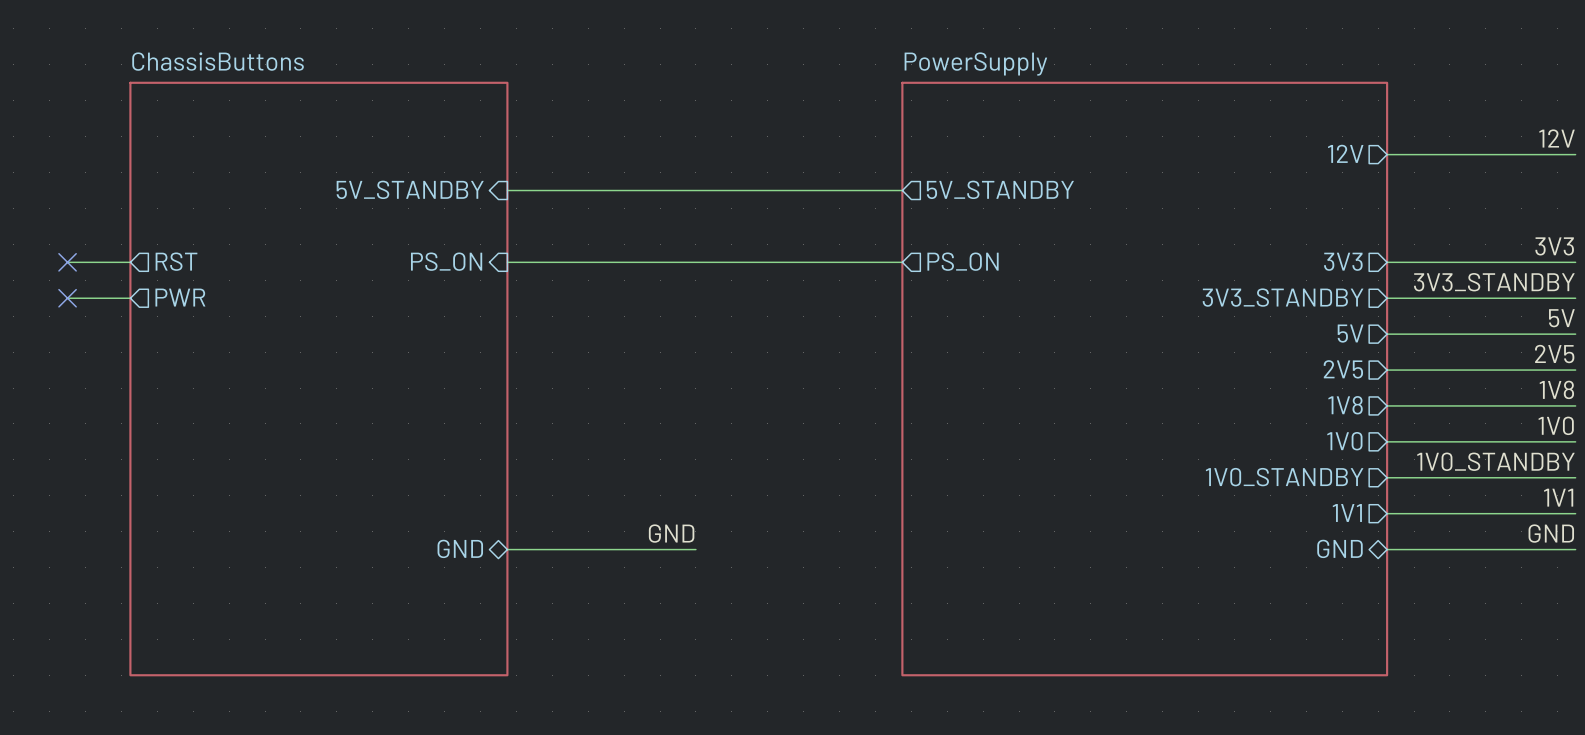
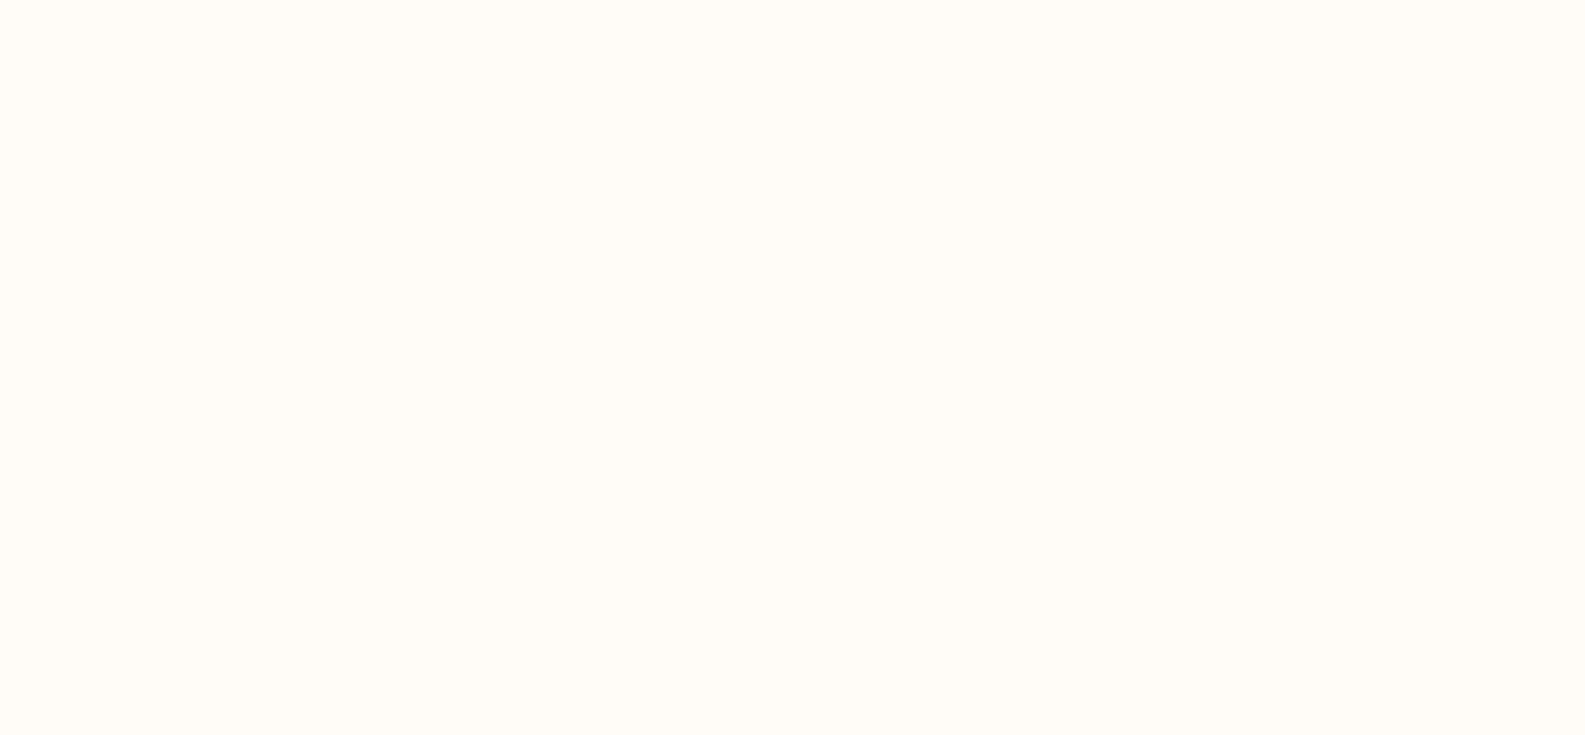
label: 12V (1557, 138) -> none
sheet pin: 12V (1345, 153) -> none
wire: (1387, 154) (1575, 154) -> none
sheet pin: 5V_STANDBY (410, 189) -> none
sheet pin: 5V_STANDBY (1000, 189) -> none
wire: (507, 190) (902, 190) -> none
label: 3V3 (1554, 246) -> none
sheet pin: RST (176, 261) -> none
sheet pin: PS_ON (446, 261) -> none
sheet pin: PS_ON (963, 261) -> none
sheet pin: 3V3 (1343, 261) -> none
wire: (67, 262) (130, 262) -> none
no-connect mark: (67, 262) -> none
wire: (507, 262) (902, 262) -> none
wire: (1387, 262) (1575, 262) -> none
label: 3V3_STANDBY (1494, 282) -> none
sheet pin: PWR (180, 297) -> none
sheet pin: 3V3_STANDBY (1283, 297) -> none
wire: (67, 298) (130, 298) -> none
no-connect mark: (67, 298) -> none
wire: (1387, 298) (1575, 298) -> none
label: 5V (1561, 318) -> none
sheet pin: 5V (1350, 333) -> none
wire: (1387, 334) (1575, 334) -> none
label: 2V5 (1554, 354) -> none
sheet pin: 2V5 (1343, 369) -> none
wire: (1387, 370) (1575, 370) -> none
sheet ChassisButtons: (318, 379) -> none
sheet PowerSupply: (1144, 379) -> none
label: 1V8 (1556, 389) -> none
sheet pin: 1V8 (1345, 405) -> none
wire: (1387, 405) (1575, 405) -> none
label: 1V0 (1556, 425) -> none
sheet pin: 1V0 (1344, 441) -> none
wire: (1387, 441) (1575, 441) -> none
label: 1V0_STANDBY (1495, 461) -> none
sheet pin: 1V0_STANDBY (1284, 477) -> none
wire: (1387, 477) (1575, 477) -> none
label: 1V1 (1558, 497) -> none
sheet pin: 1V1 (1347, 513) -> none
wire: (1387, 513) (1575, 513) -> none
label: GND (671, 533) -> none
label: GND (1551, 533) -> none
sheet pin: GND (460, 548) -> none
sheet pin: GND (1339, 548) -> none
wire: (507, 549) (695, 549) -> none
wire: (1387, 549) (1575, 549) -> none

